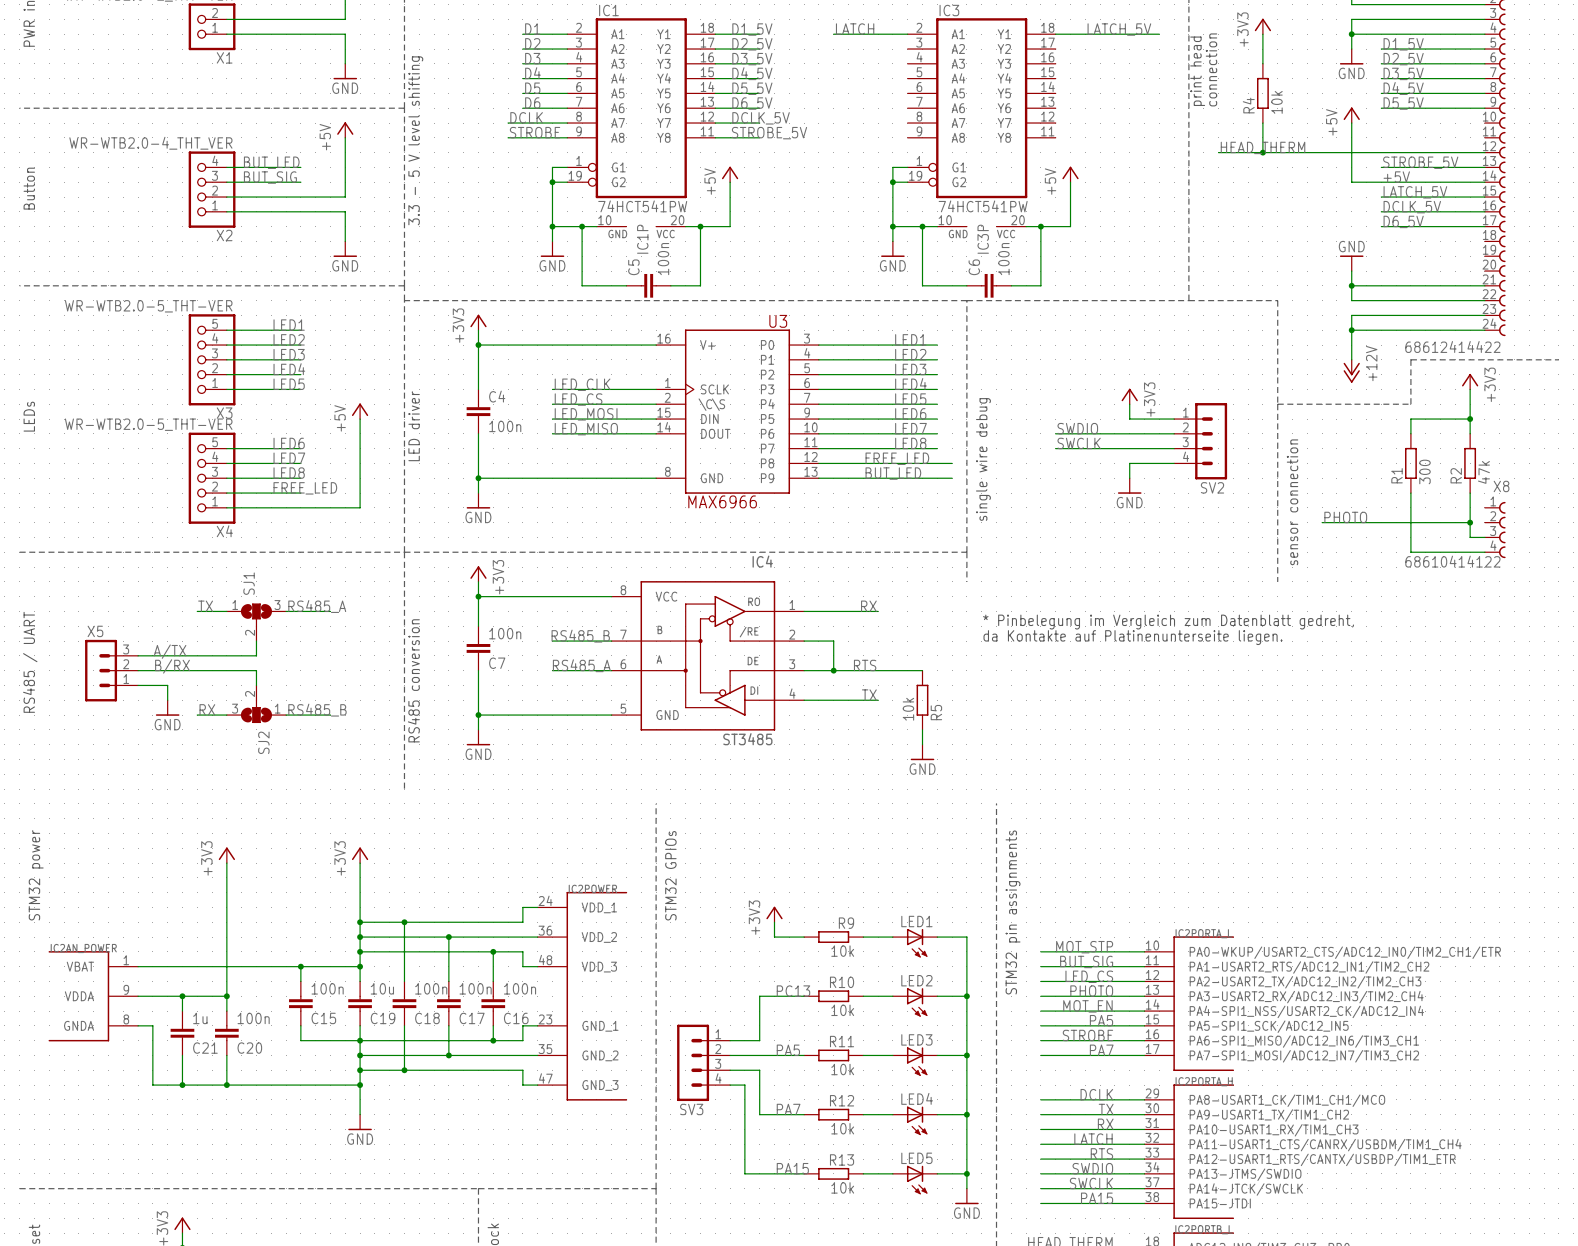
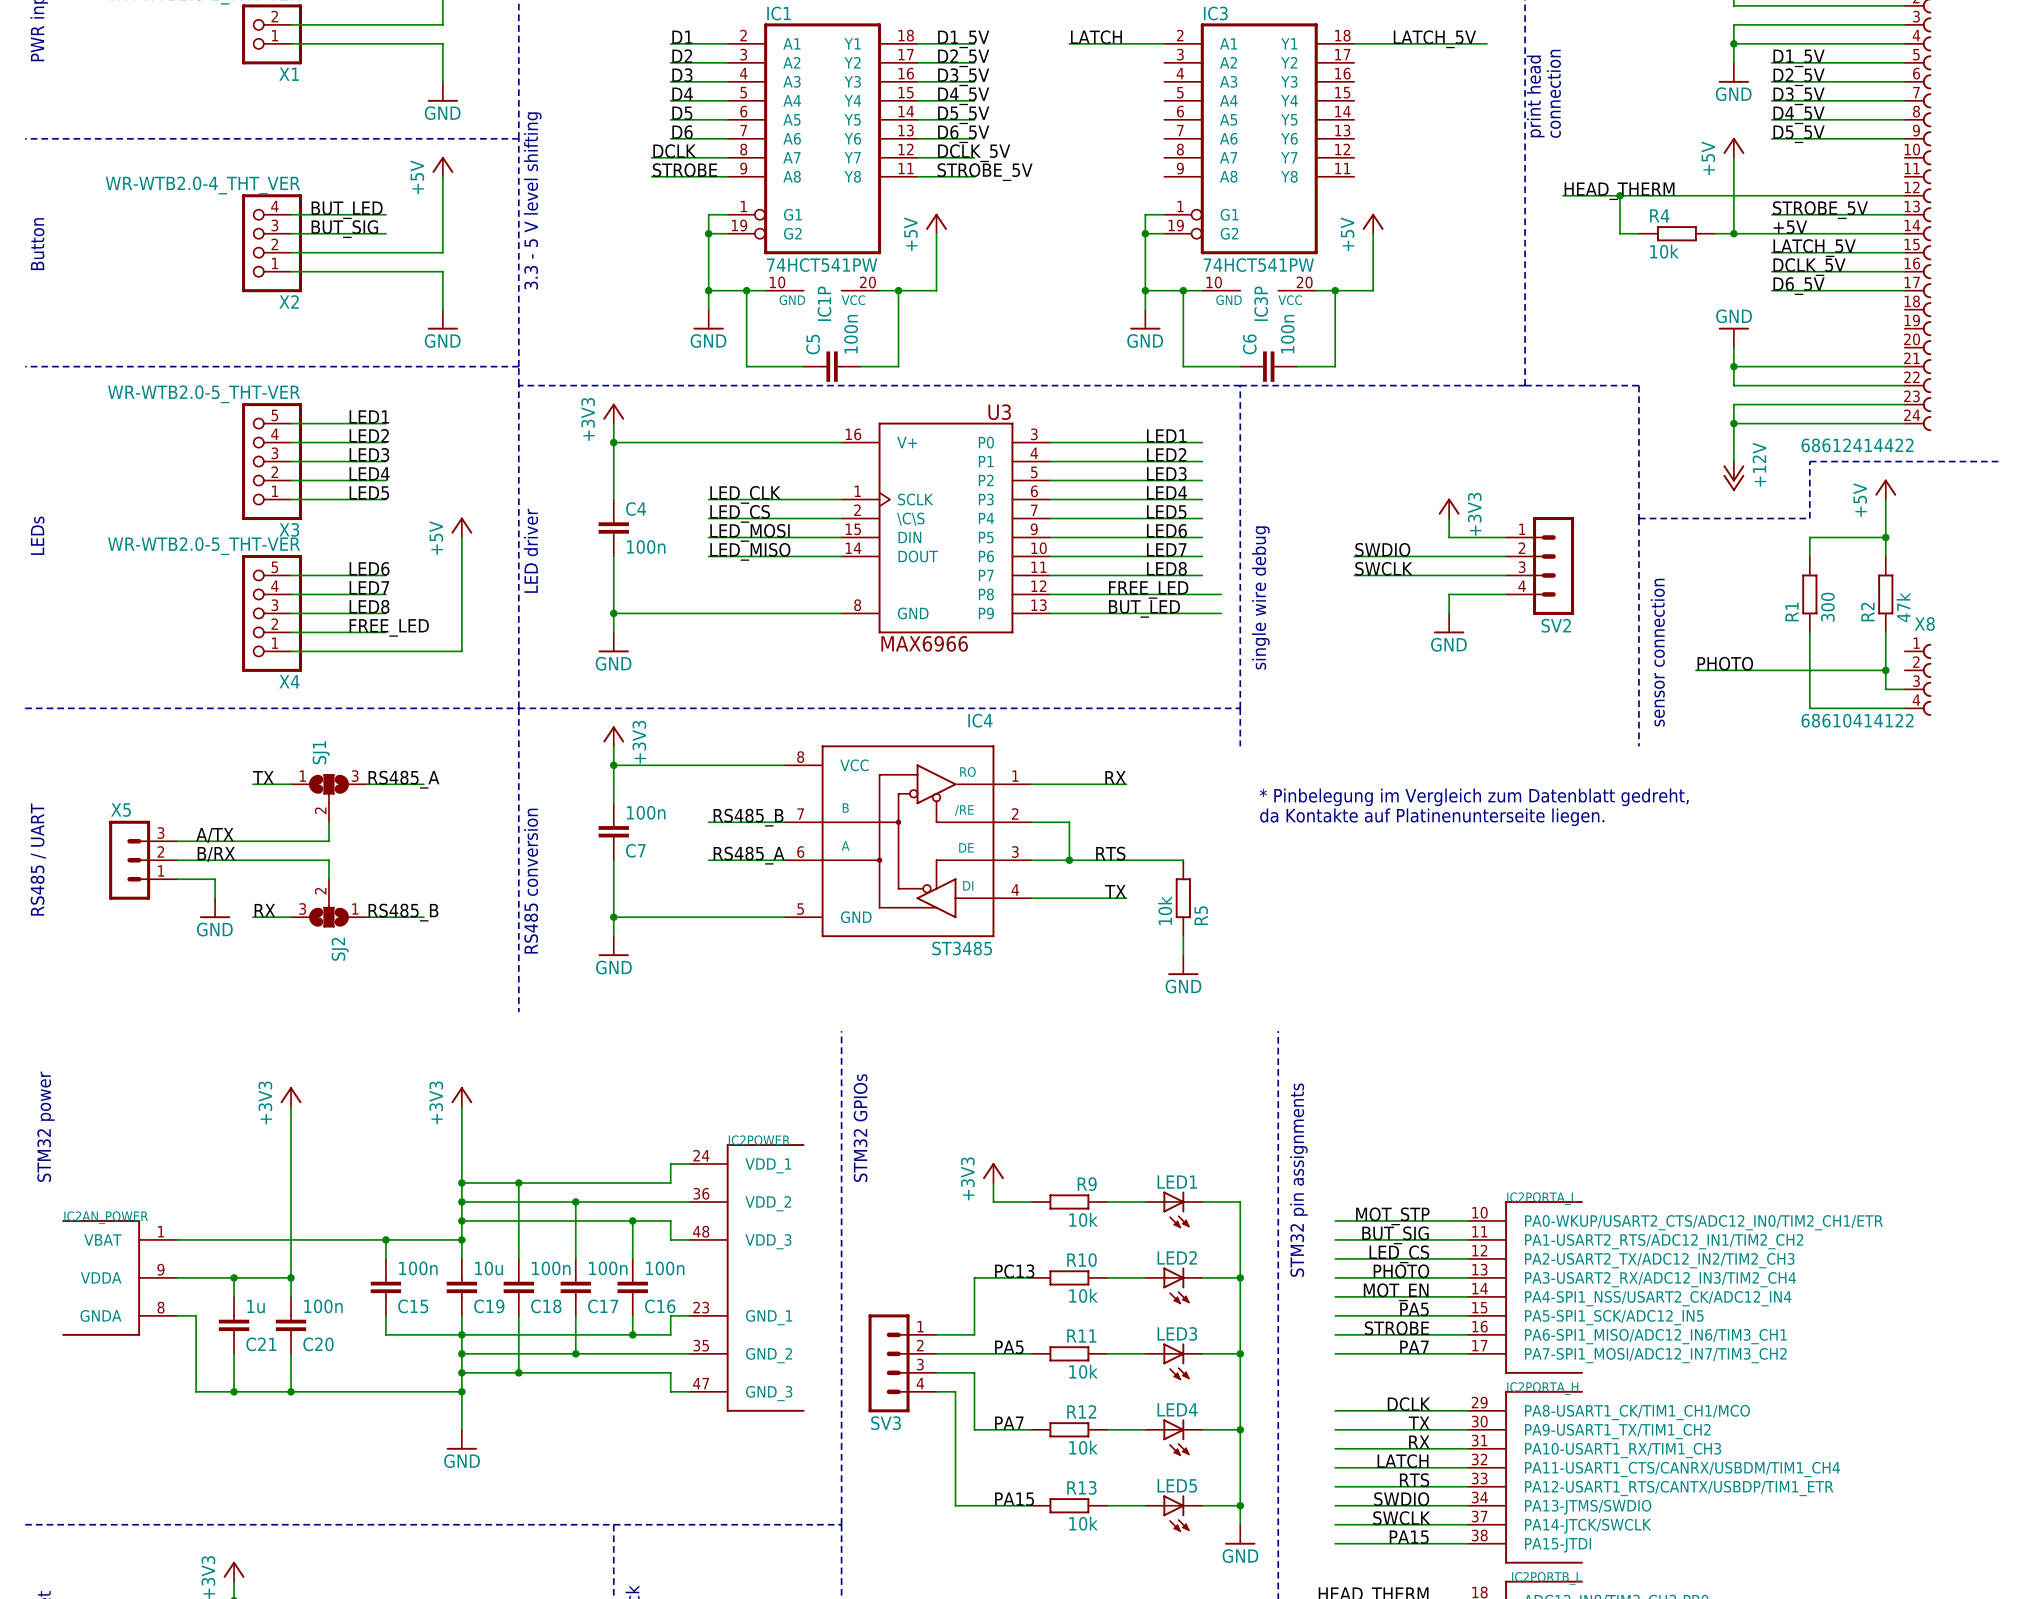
power symbol: +3V3 (1262, 26) -> none
wire: (1262, 34) (1262, 63) -> none
R4 rotation: 0° (1262, 93) -> 90° clockwise (1676, 233)
R4 position: (1262, 93) -> (1676, 233)
wire: (1262, 123) (1262, 152) -> (1638, 233) (1619, 233) (1619, 195)
wire: none -> (1714, 233) (1733, 233)
junction: none -> (1733, 233)
power symbol: +3V3 (1470, 381) -> +5V (1885, 489)

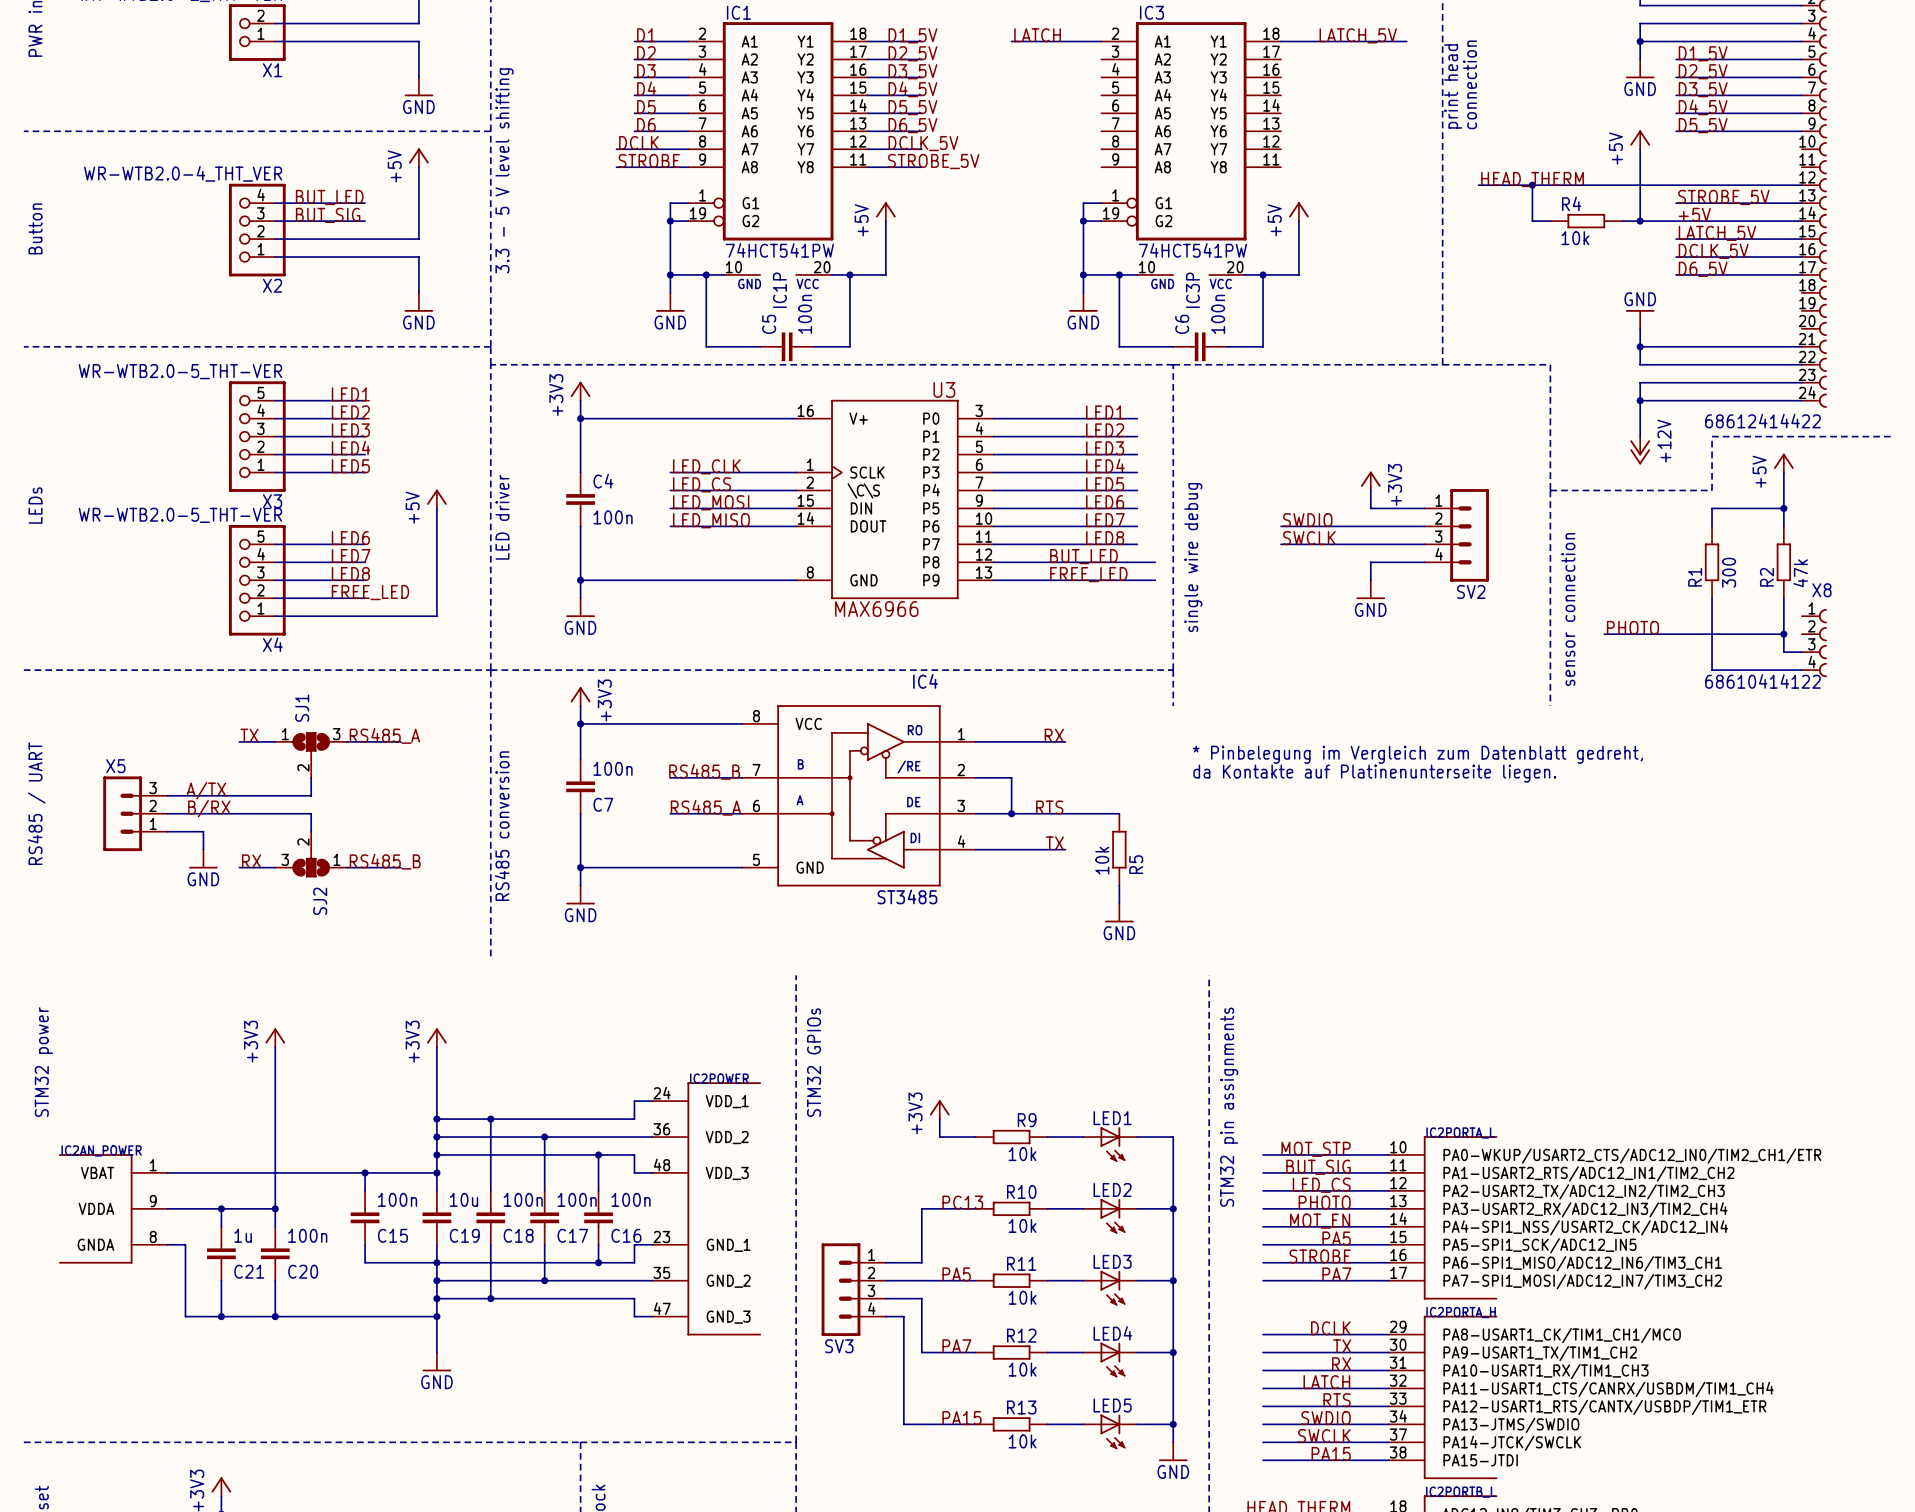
label: FREE_LED (1148, 589) -> BUT_LED (1084, 556)
label: BUT_LED (1144, 608) -> FREE_LED (1088, 574)

